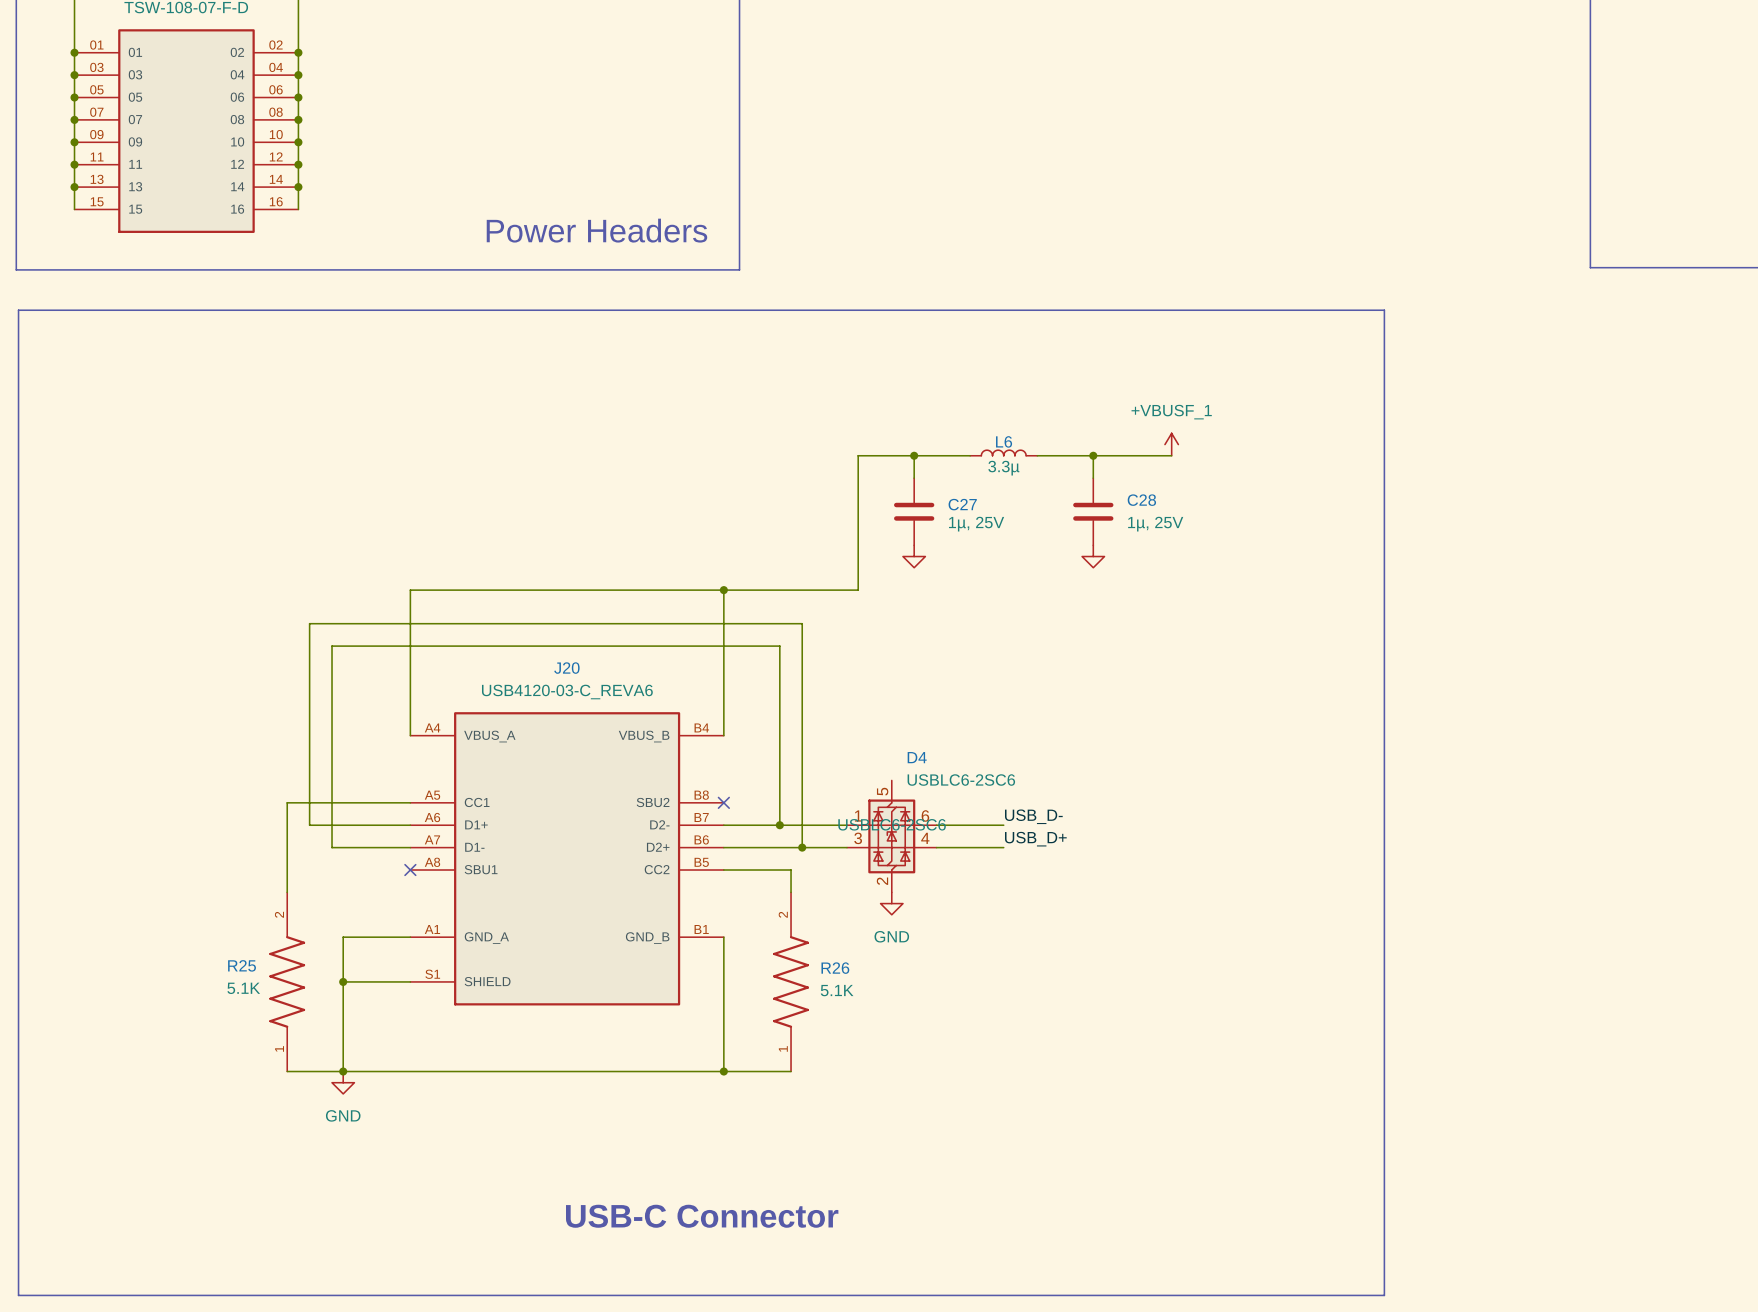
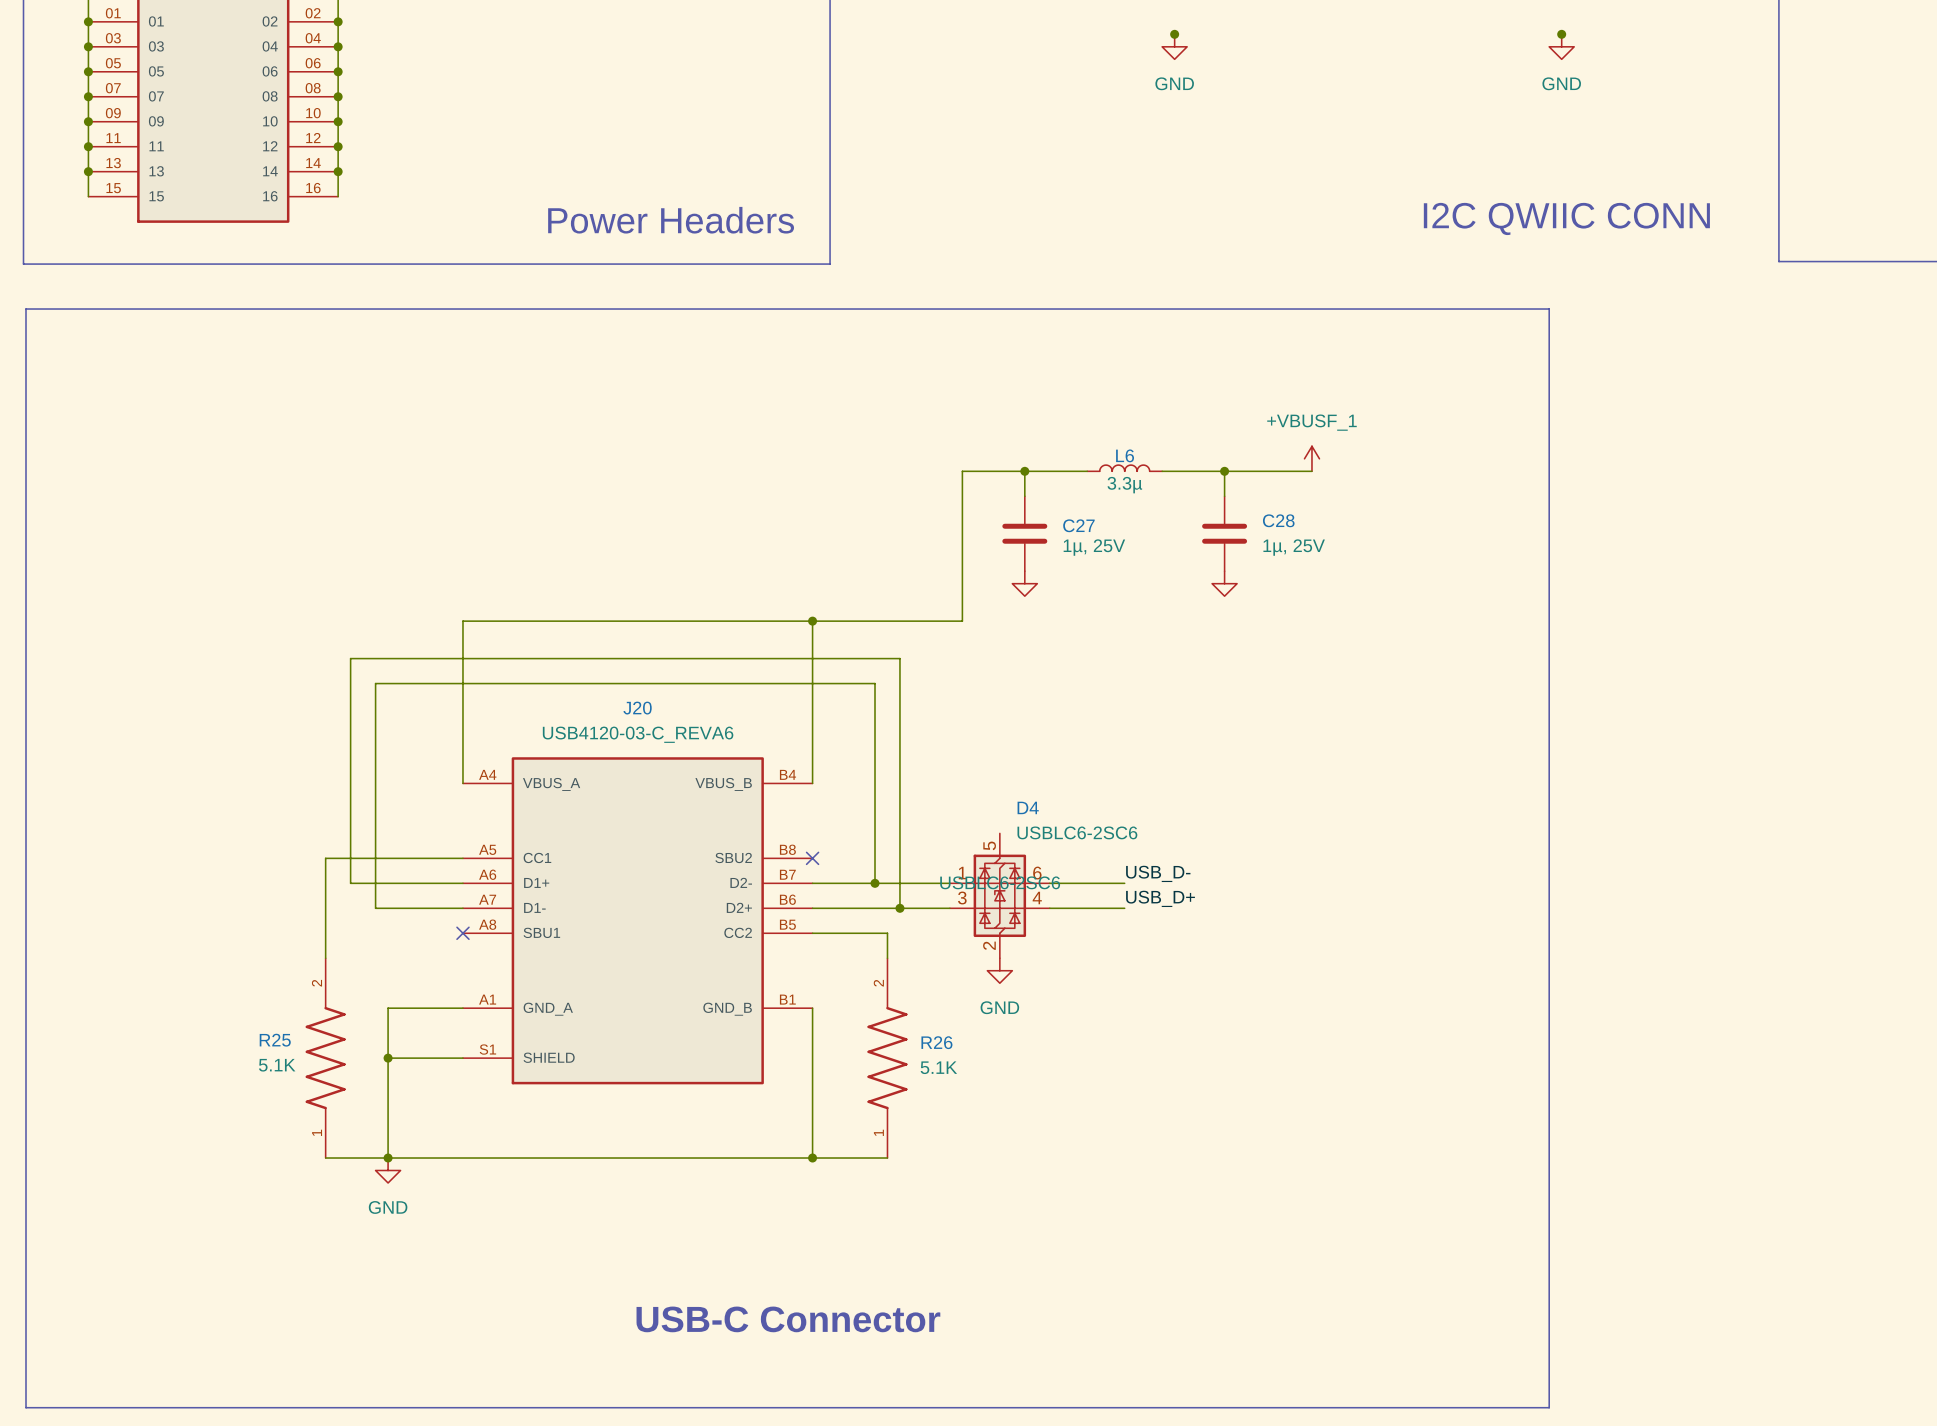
junction: none -> (1174, 34)
junction: none -> (1561, 34)
power symbol: none -> GND (1174, 46)
power symbol: none -> GND (1561, 46)
text: none -> I2C QWIIC CONN (1566, 218)

